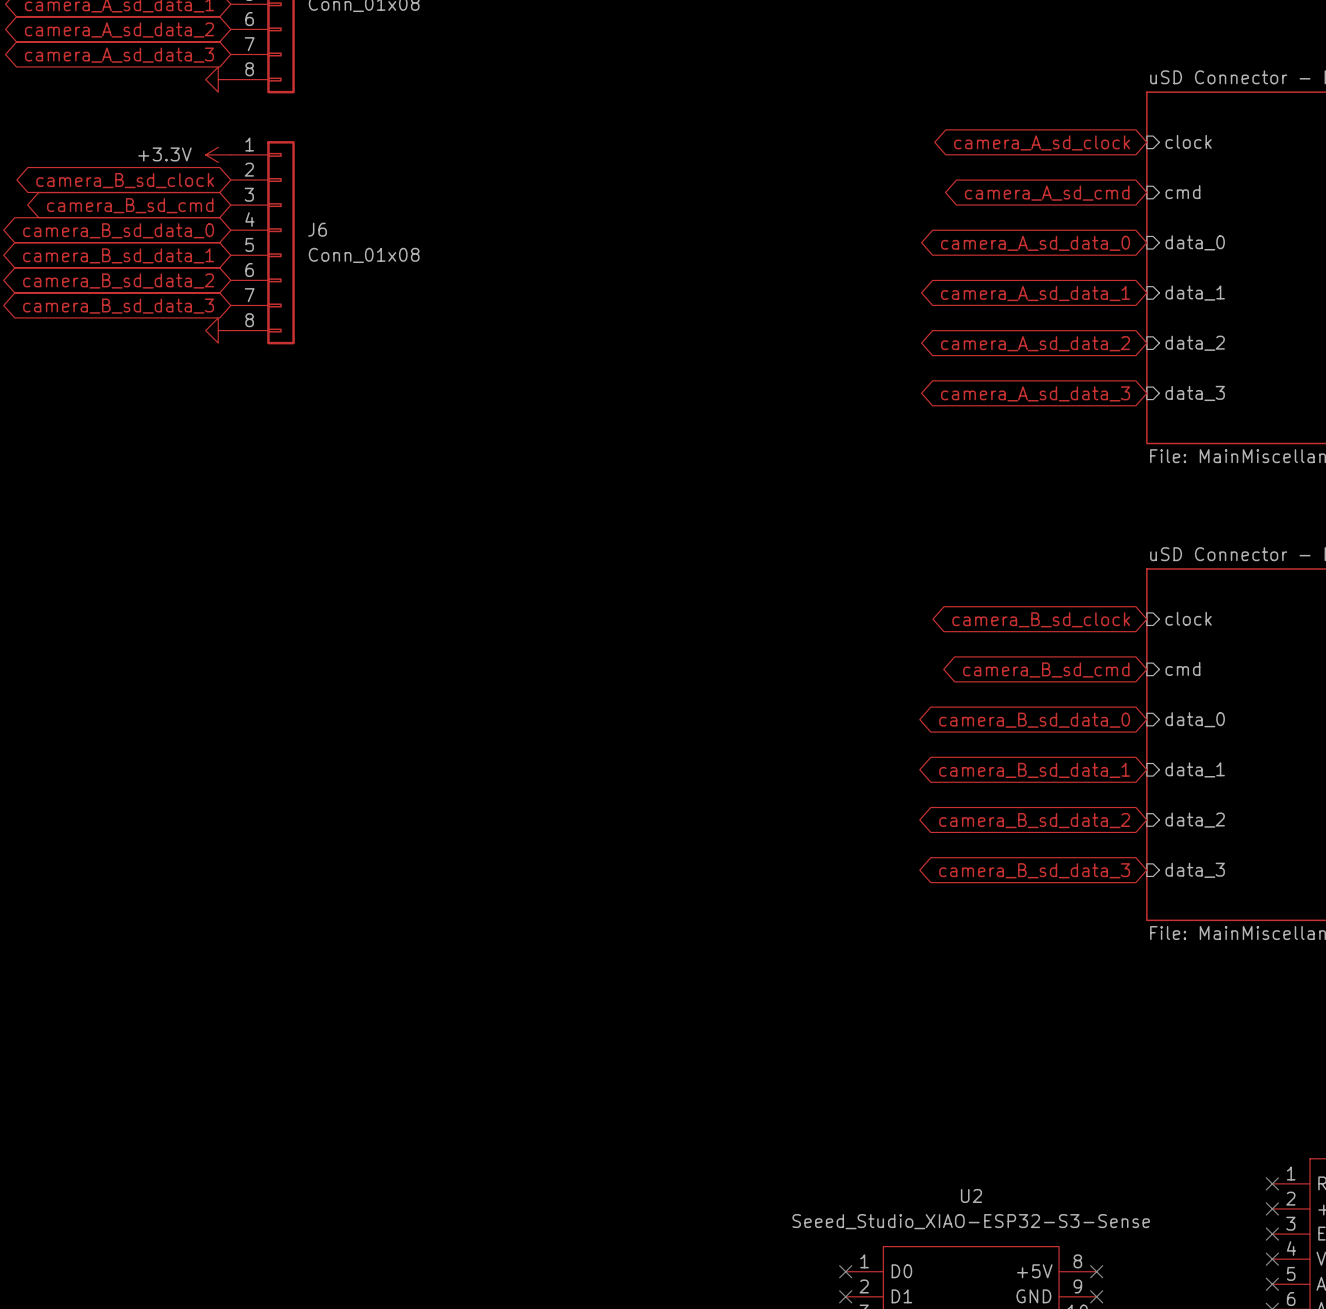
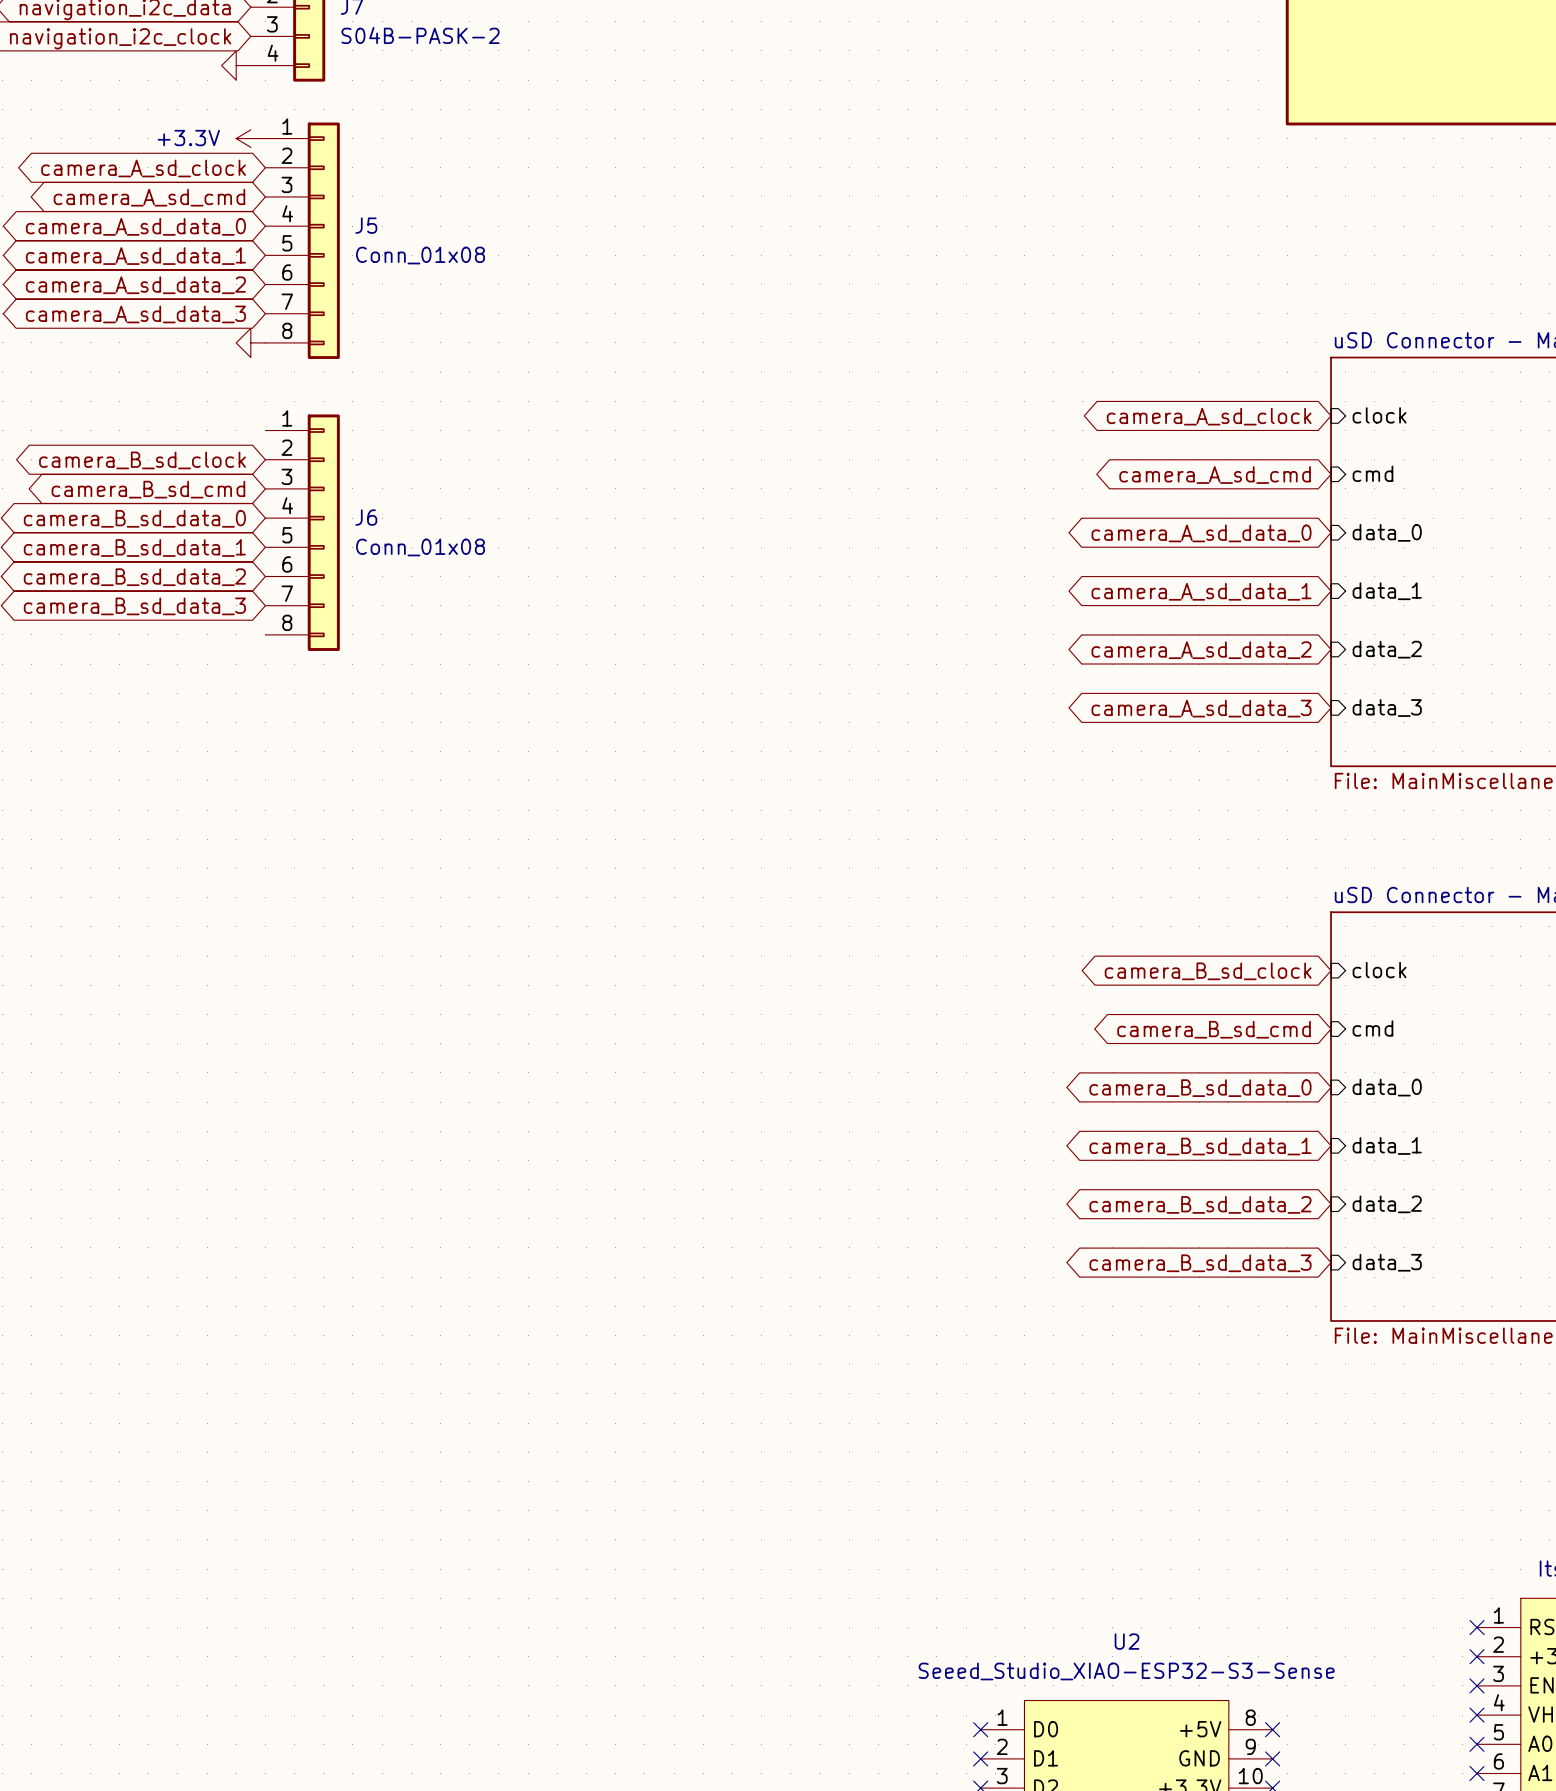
power symbol: +3.3V (218, 154) -> none
power symbol: (218, 330) -> none

